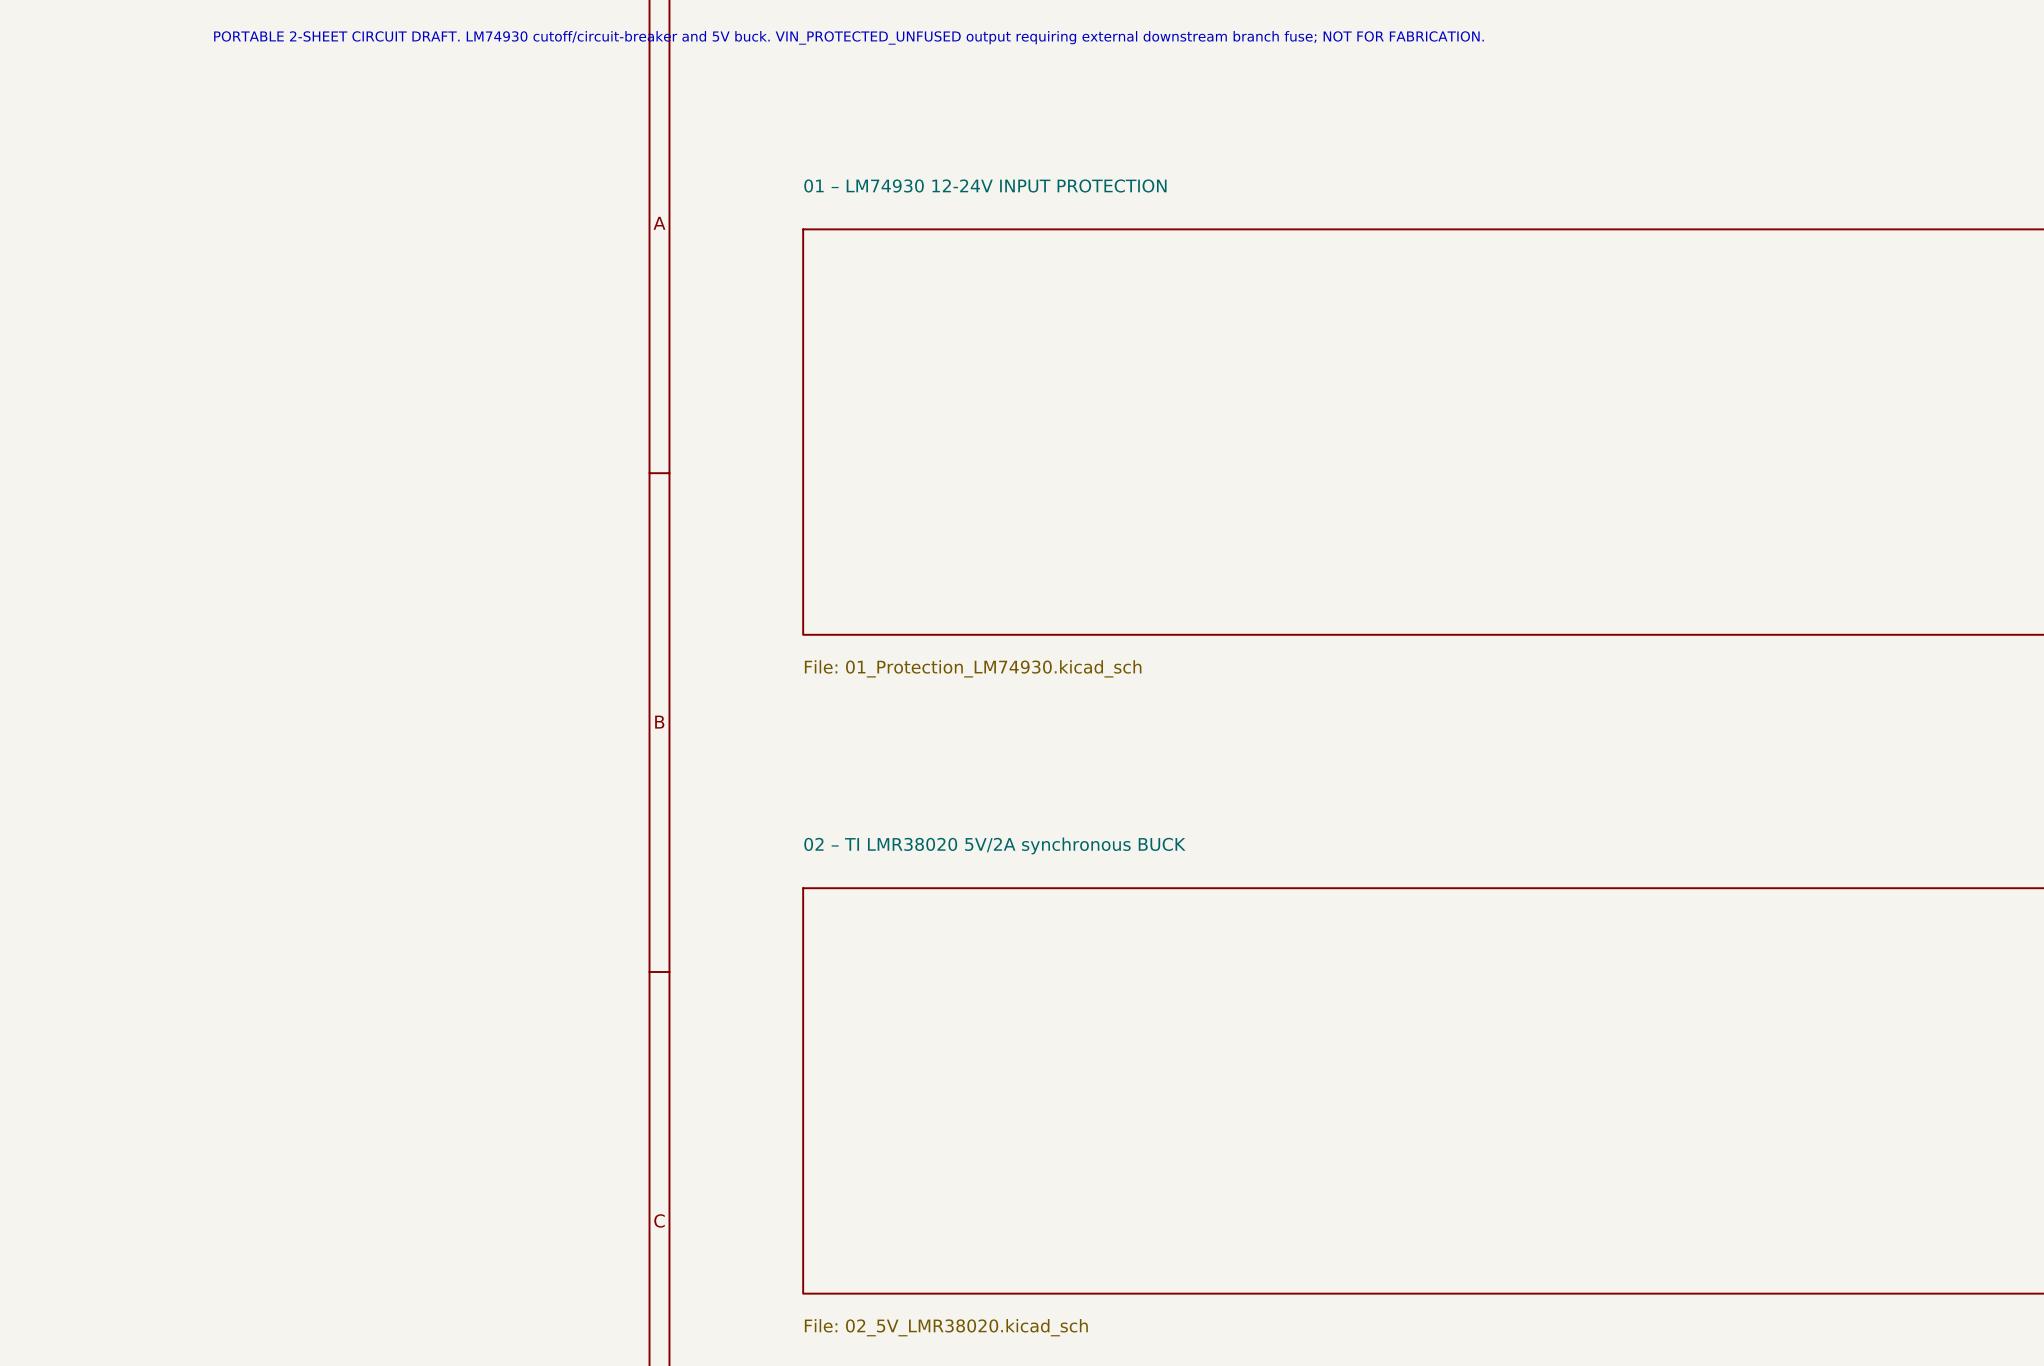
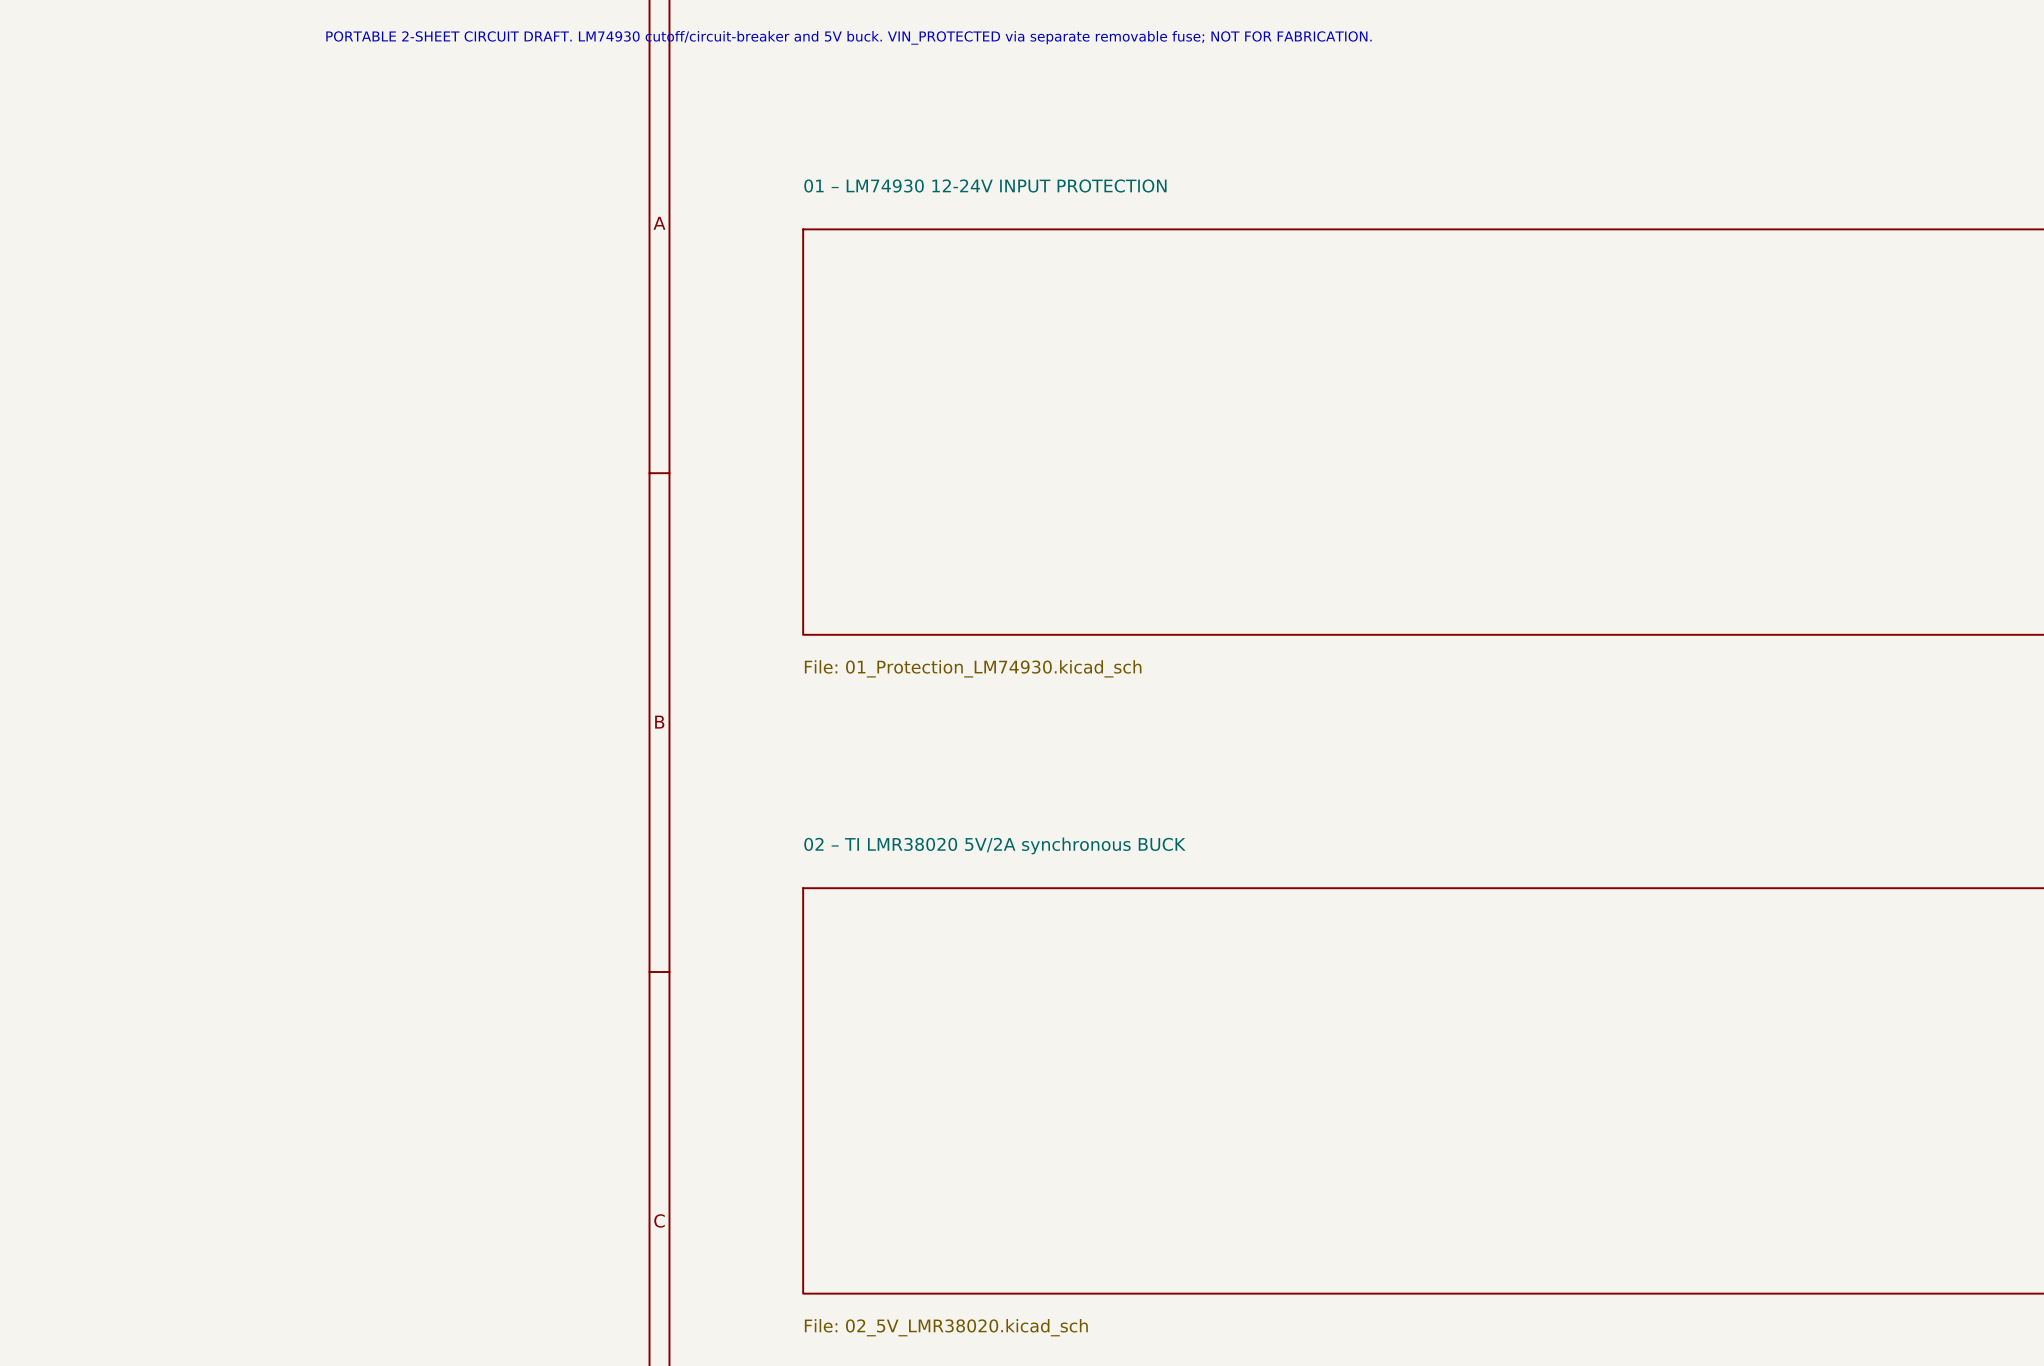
text: PORTABLE 2-SHEET CIRCUIT DRAFT. LM74930 cutoff/circuit-breaker and 5V buck. VIN_PROTECTED_UNFUSED output requiring external downstream branch fuse; NOT FOR FABRICATION. (848, 37) -> PORTABLE 2-SHEET CIRCUIT DRAFT. LM74930 cutoff/circuit-breaker and 5V buck. VIN_PROTECTED via separate removable fuse; NOT FOR FABRICATION. (848, 37)

